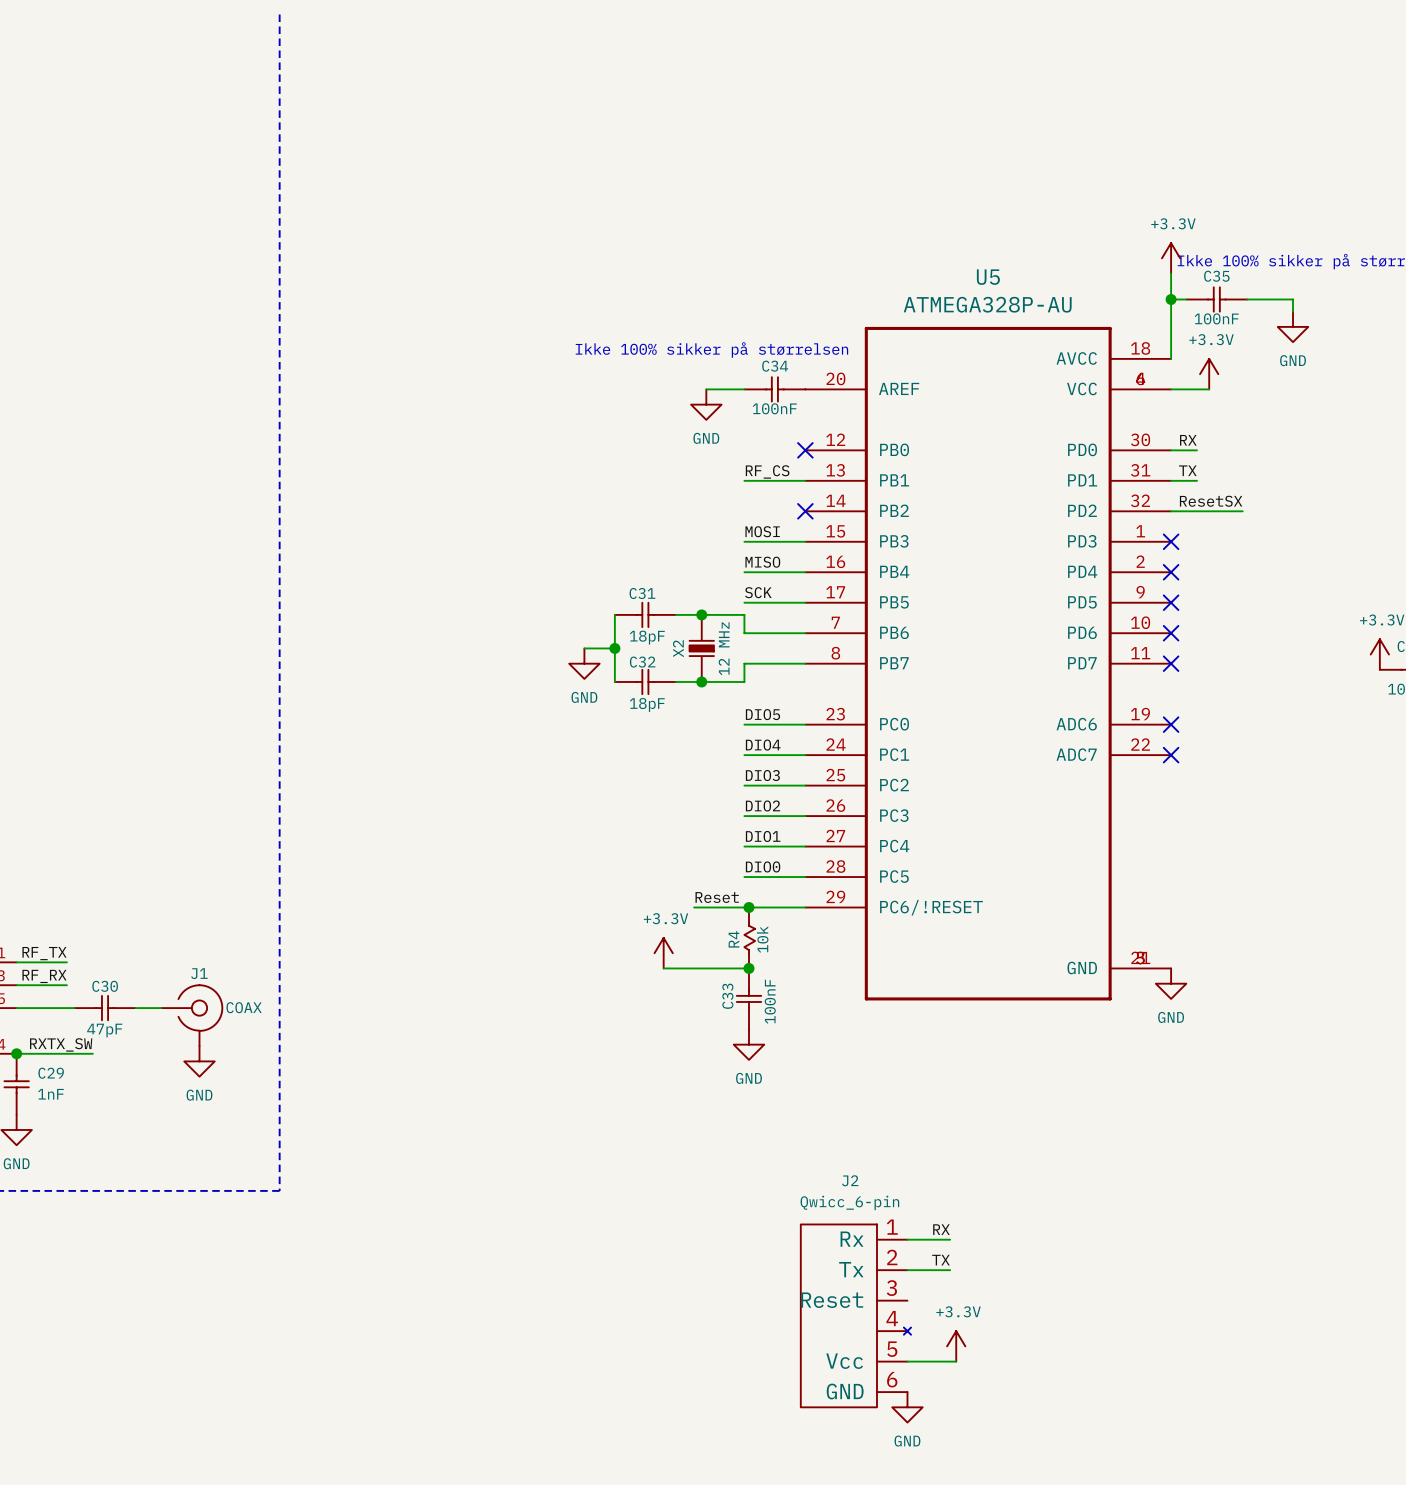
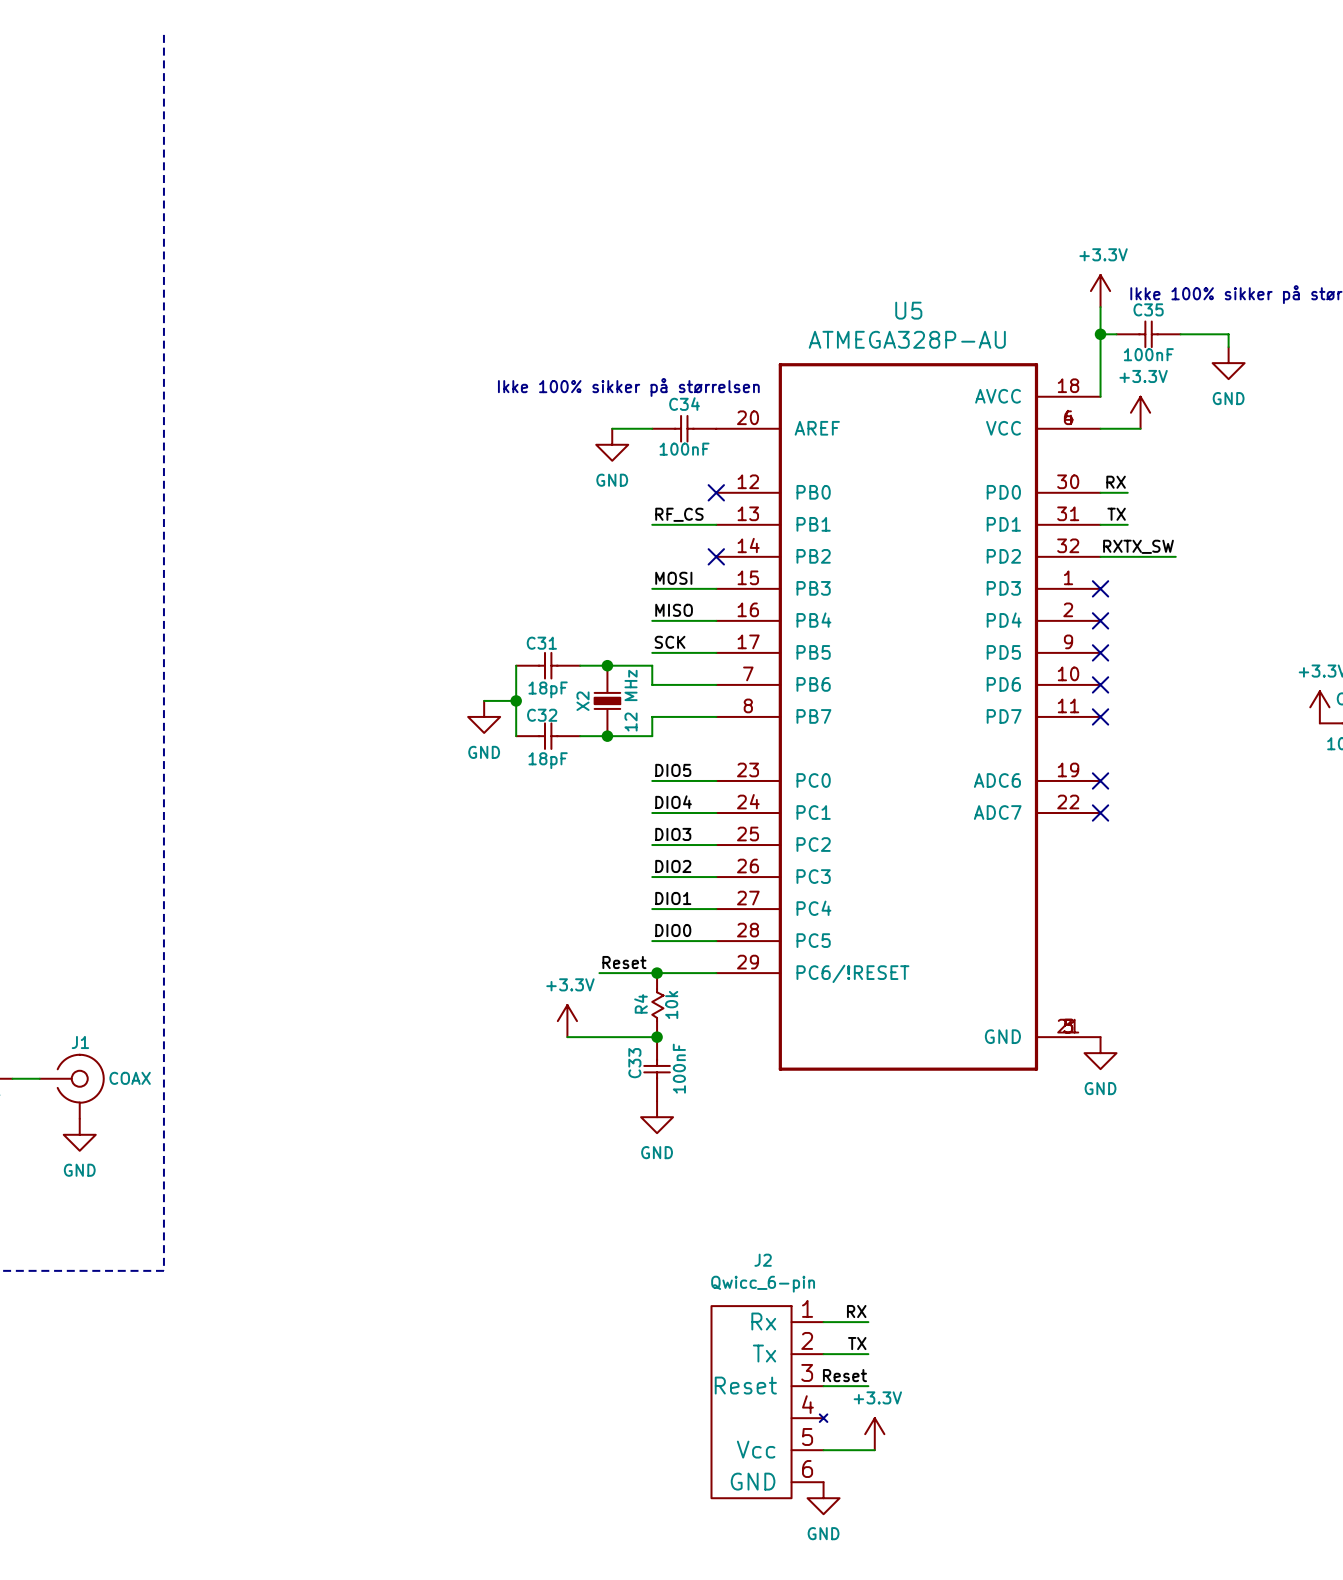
label: ResetSX (1211, 501) -> RXTX_SW (1138, 546)
label: none -> Reset (844, 1375)
wire: none -> (823, 1386) (868, 1386)

